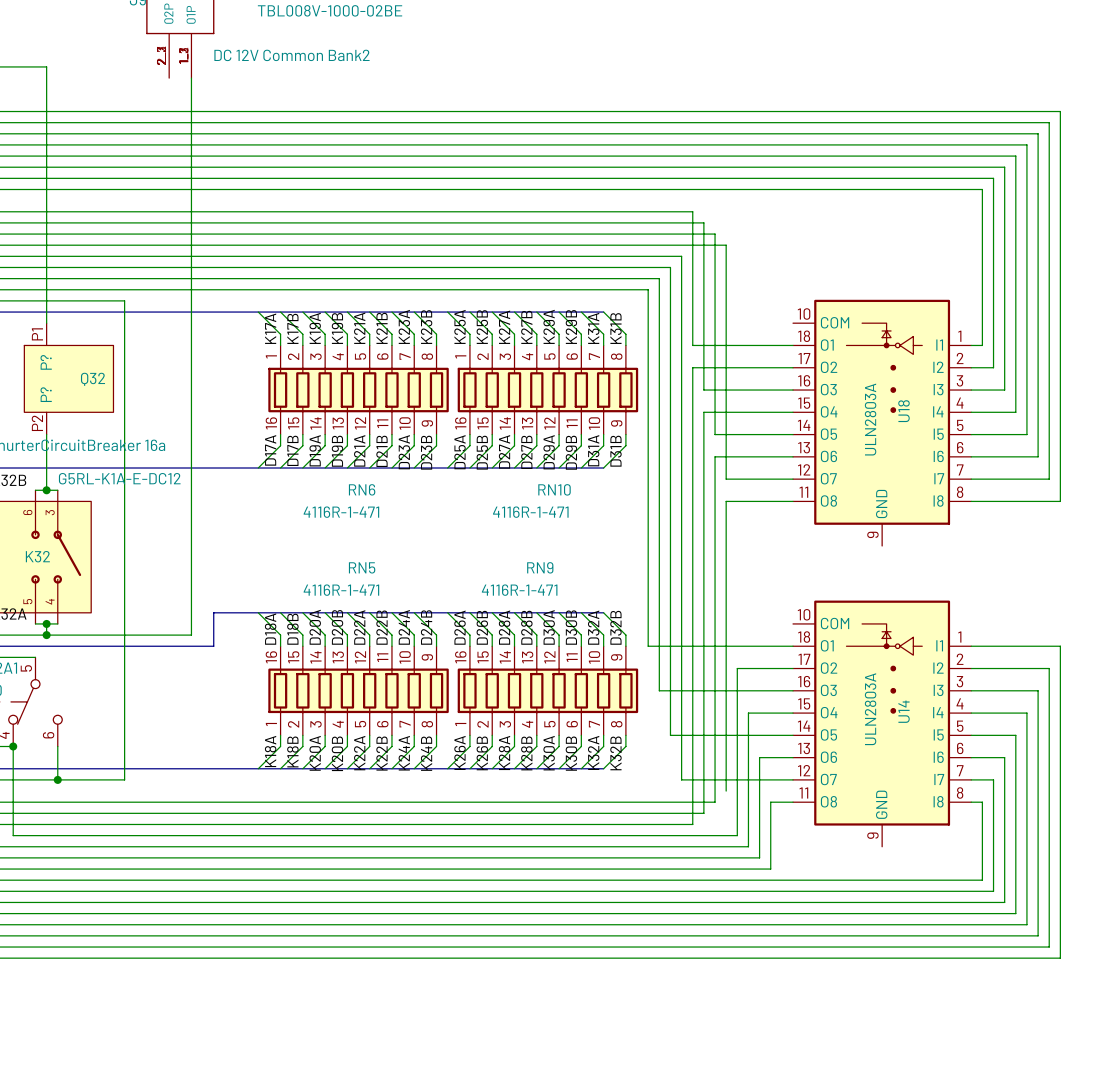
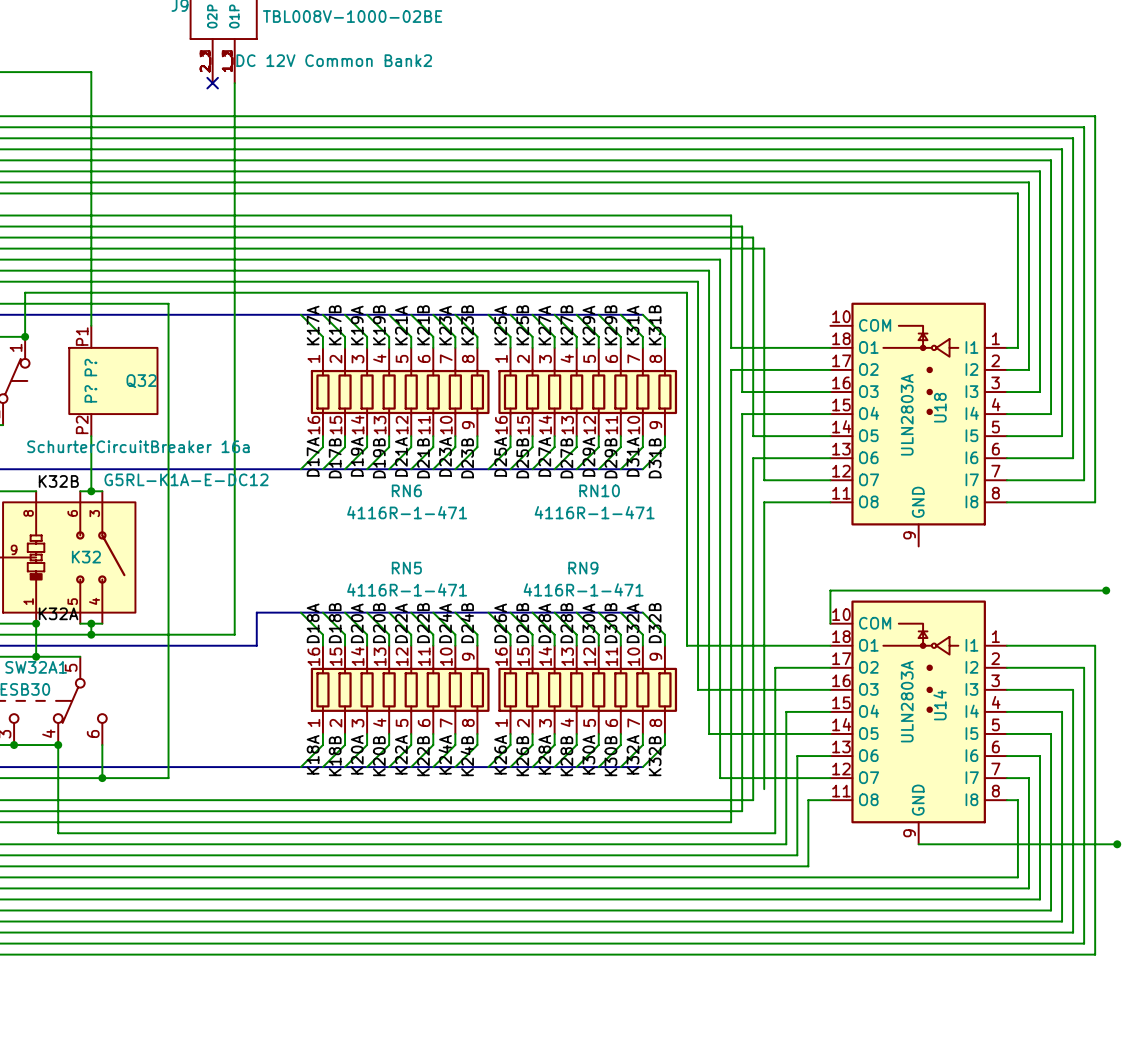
no-connect mark: none -> (212, 83)
wire: none -> (1106, 590) (830, 590) (830, 623)
junction: none -> (1106, 590)
wire: none -> (918, 844) (1117, 844)
junction: none -> (1117, 844)

